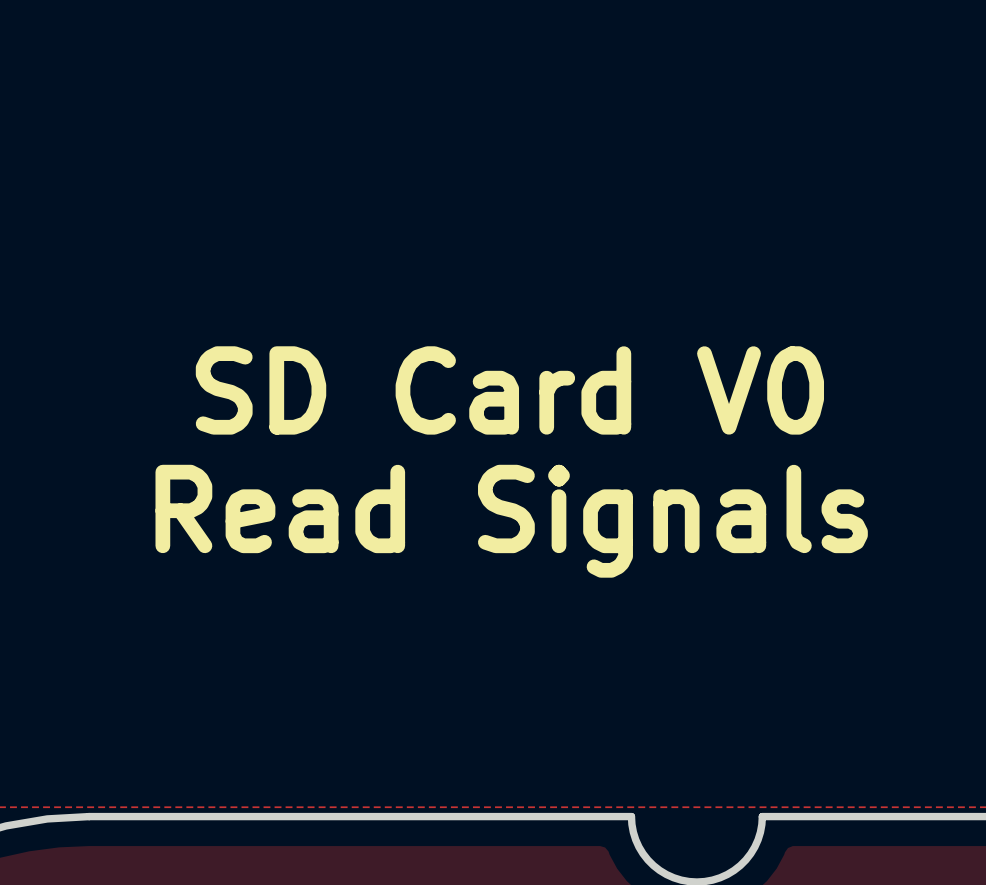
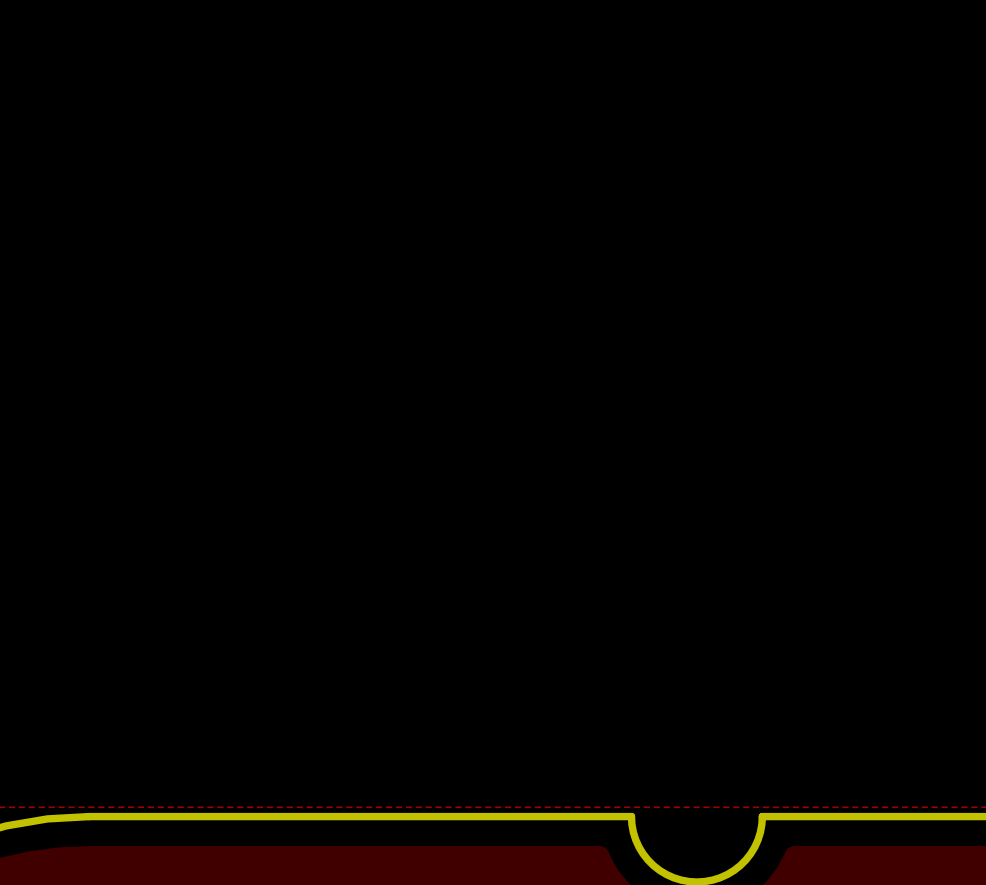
text: SD Card V0 (509, 390) -> none
text: Read Signals (511, 521) -> none

